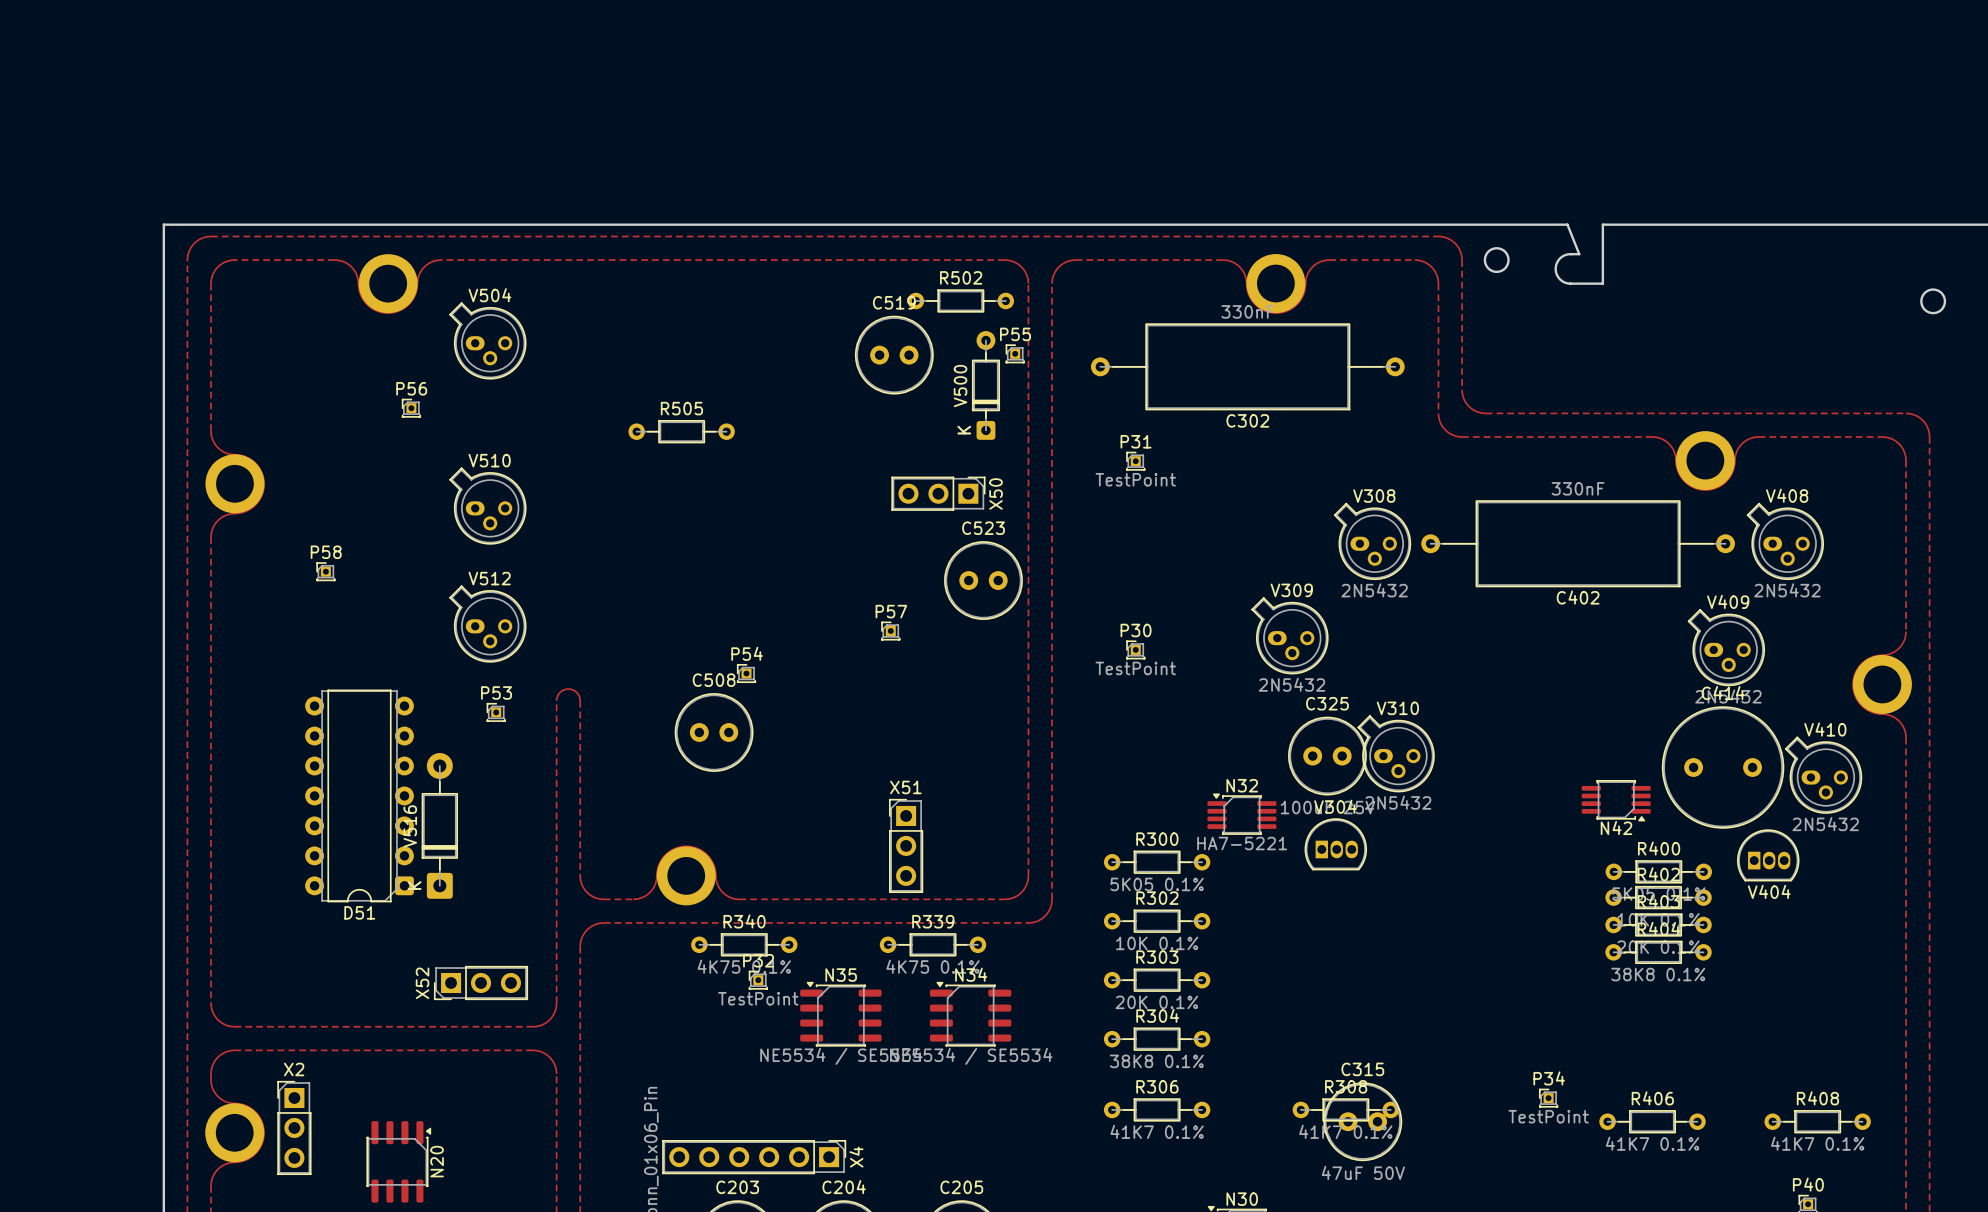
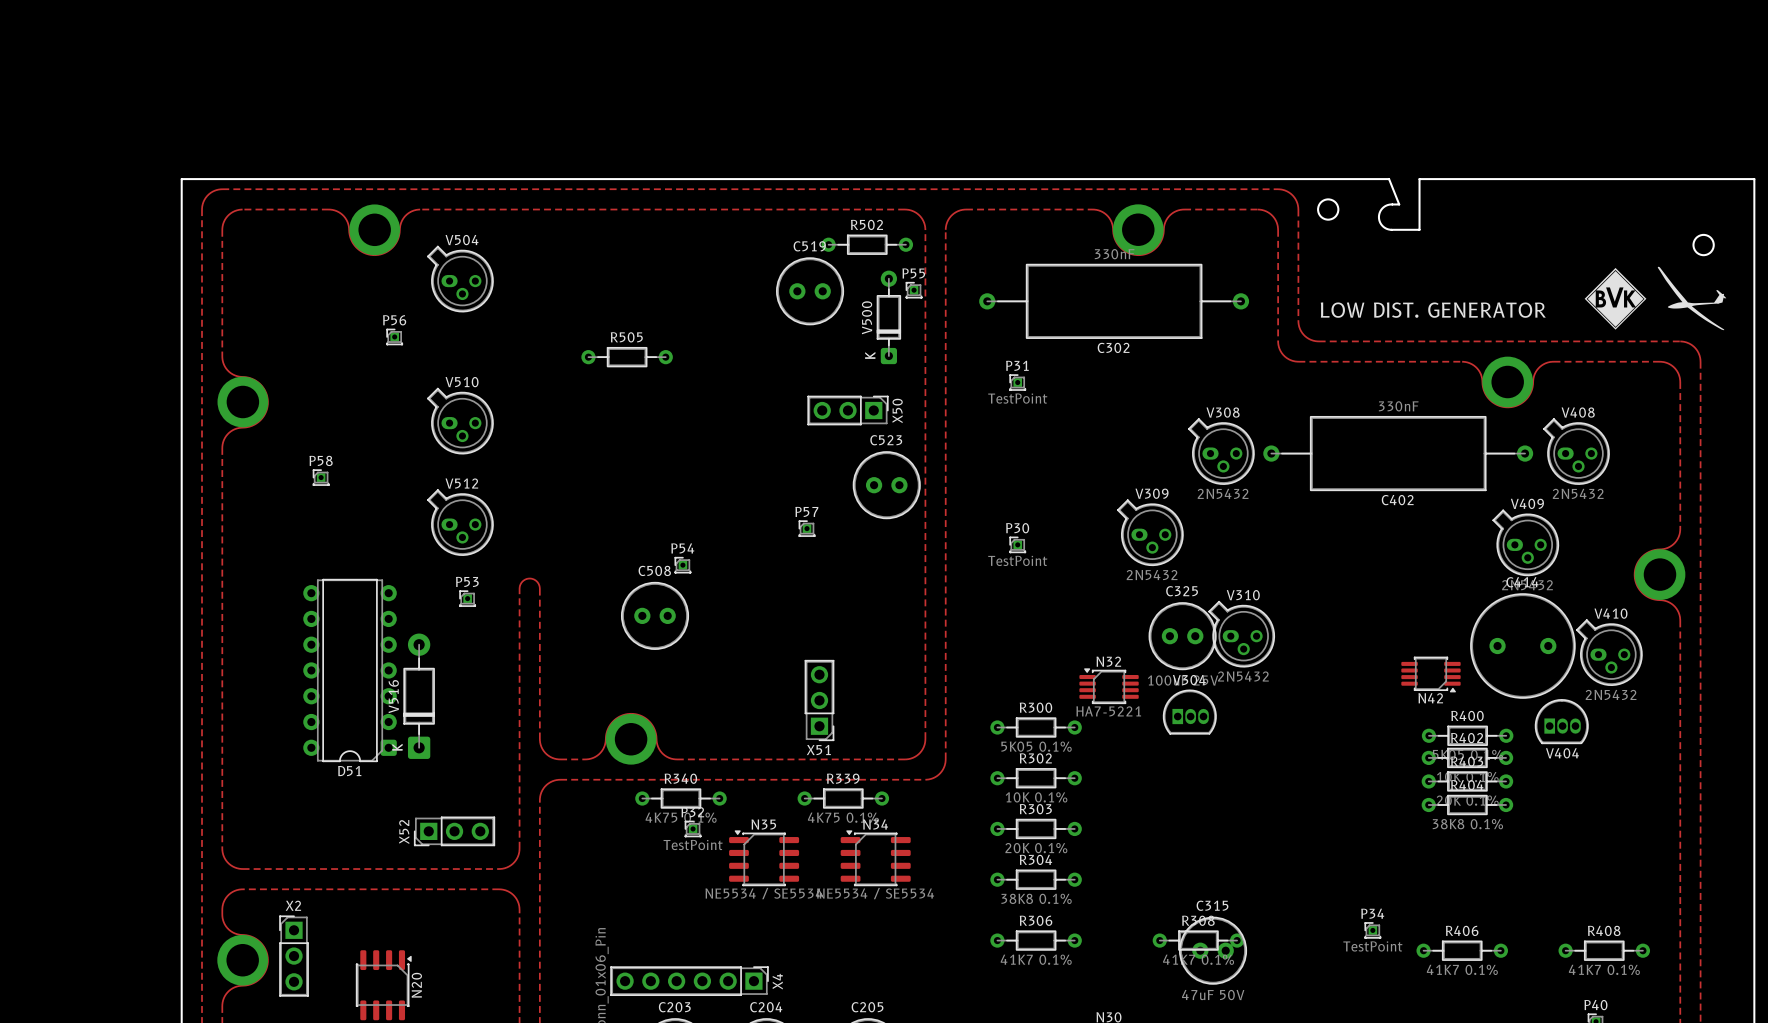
drawing: none -> [1584, 266, 1727, 331]
text: none -> LOW DIST. GENERATOR (1433, 310)
X51 rotation: 0° (906, 845) -> 180° (819, 700)

